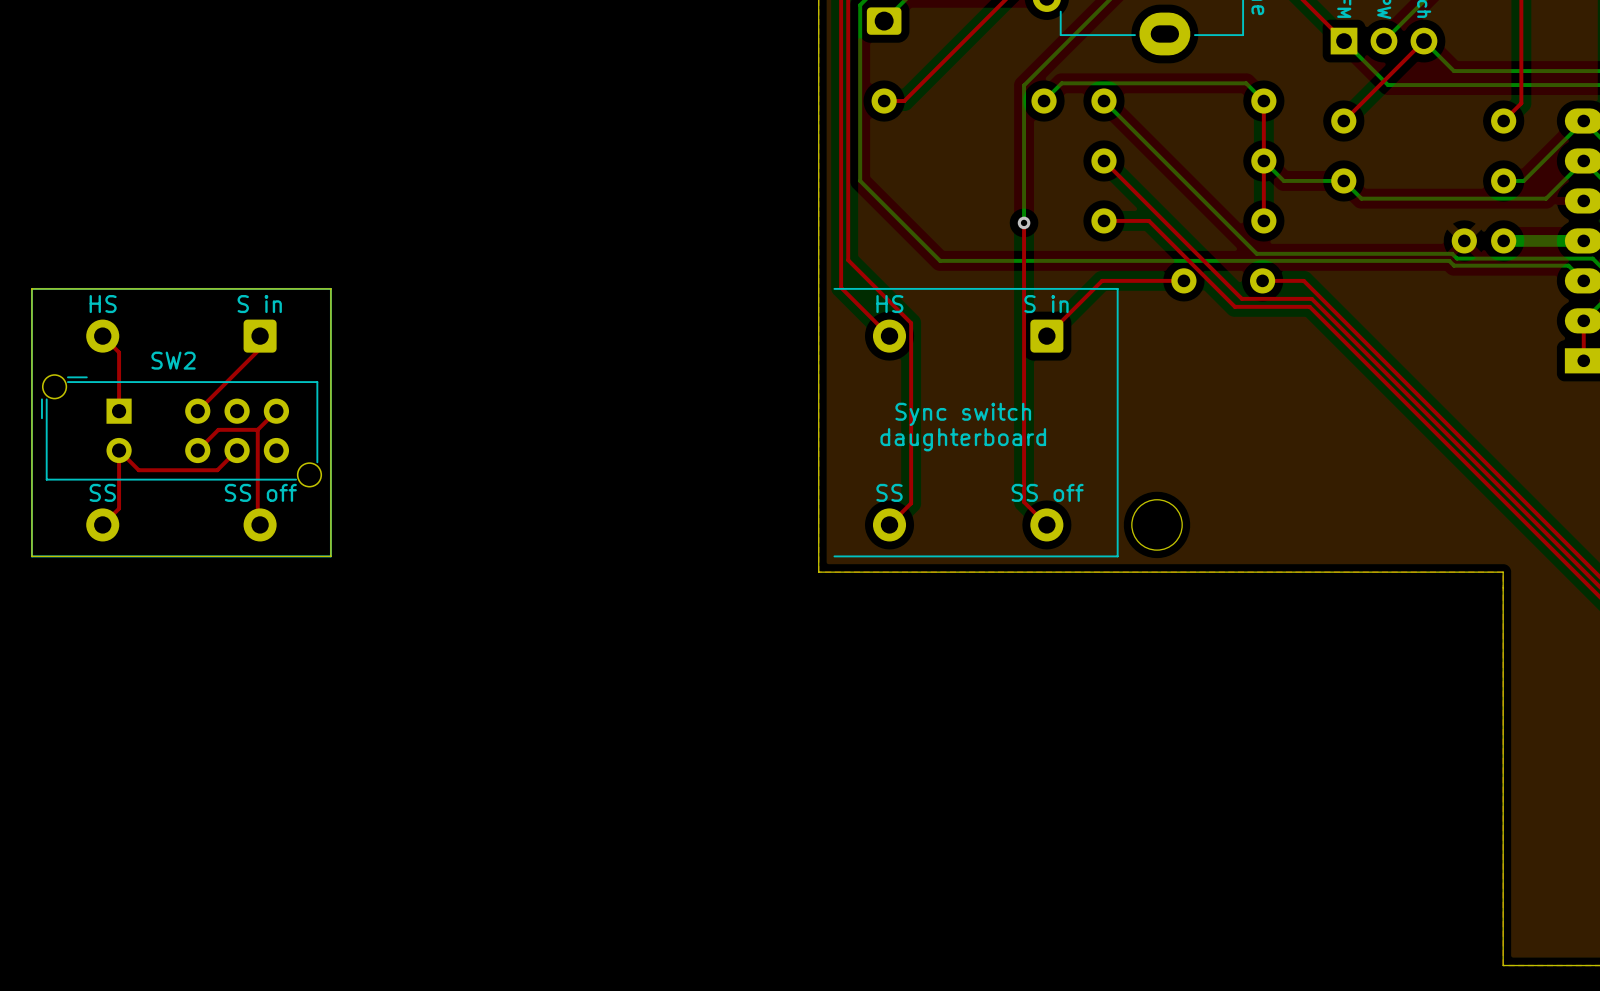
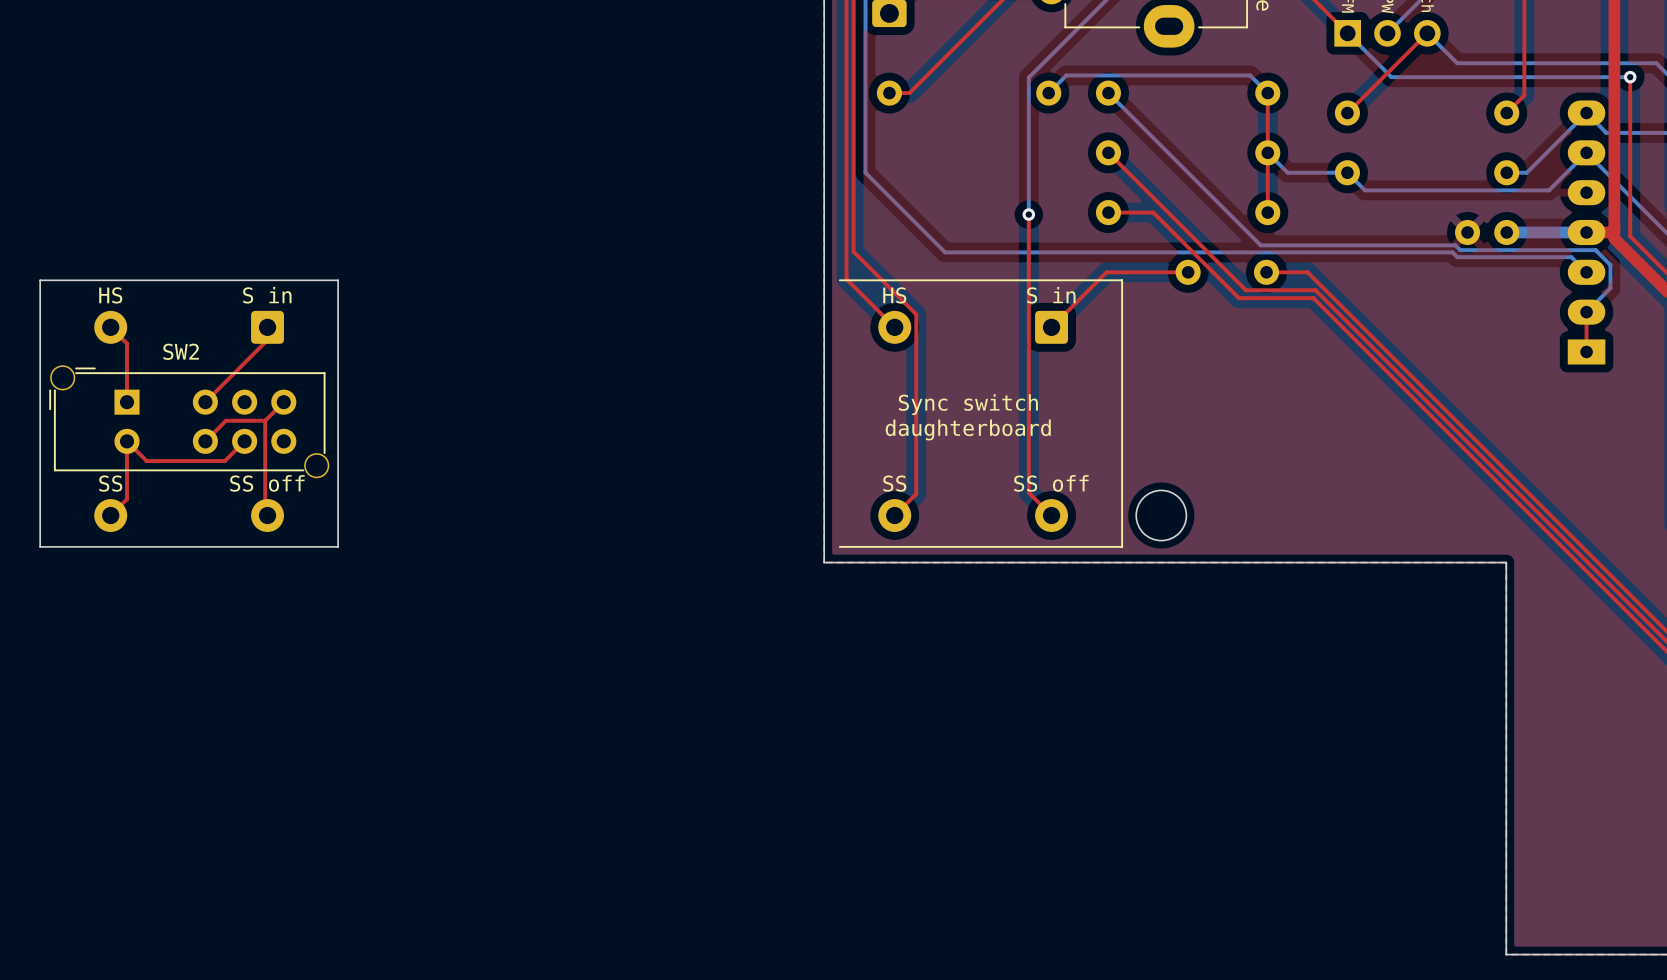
line: (31, 288) (31, 556) (330, 556) (330, 288) (31, 288) -> none

